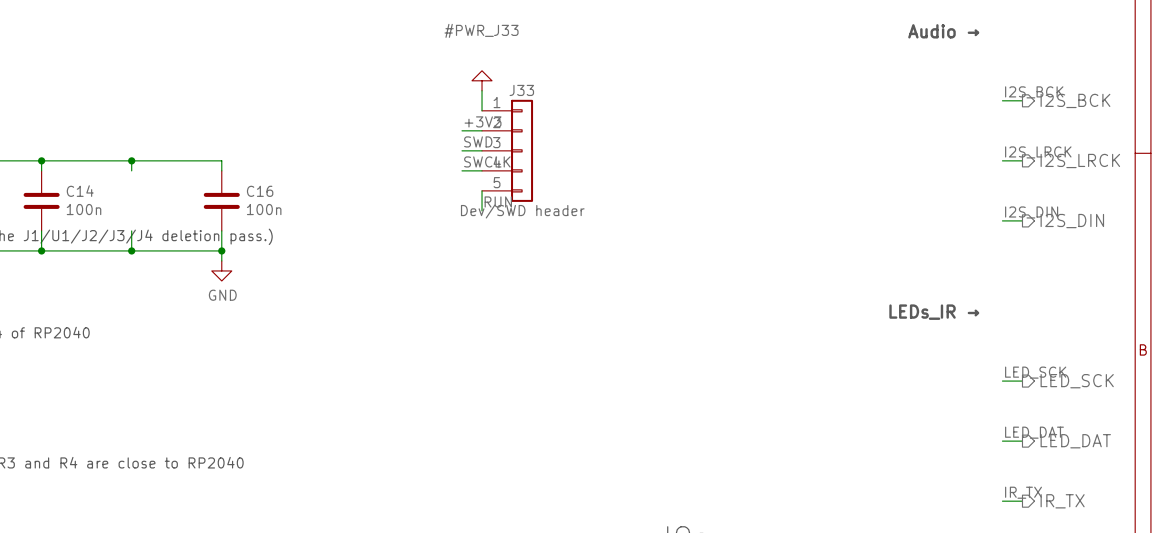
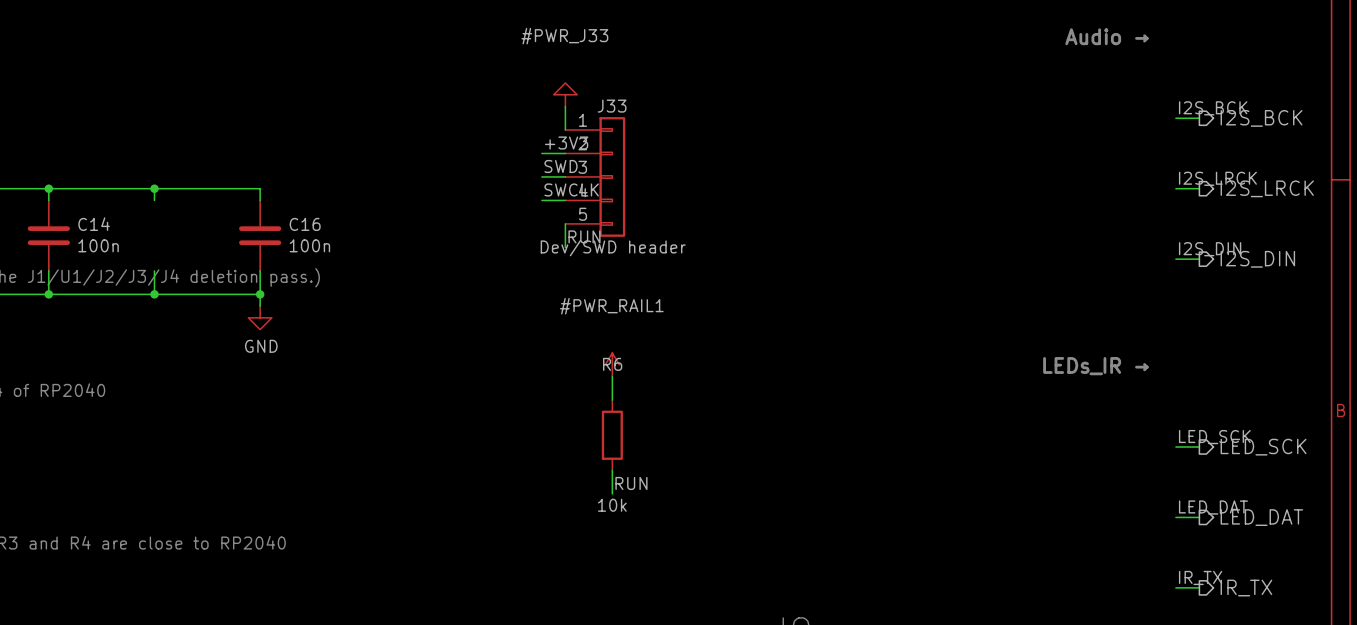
#PWR_RAIL1: none -> (612, 364)
wire: none -> (612, 376) (612, 400)
R6: none -> 10k (612, 435)
wire: none -> (612, 470) (612, 493)
label: none -> RUN (631, 483)

